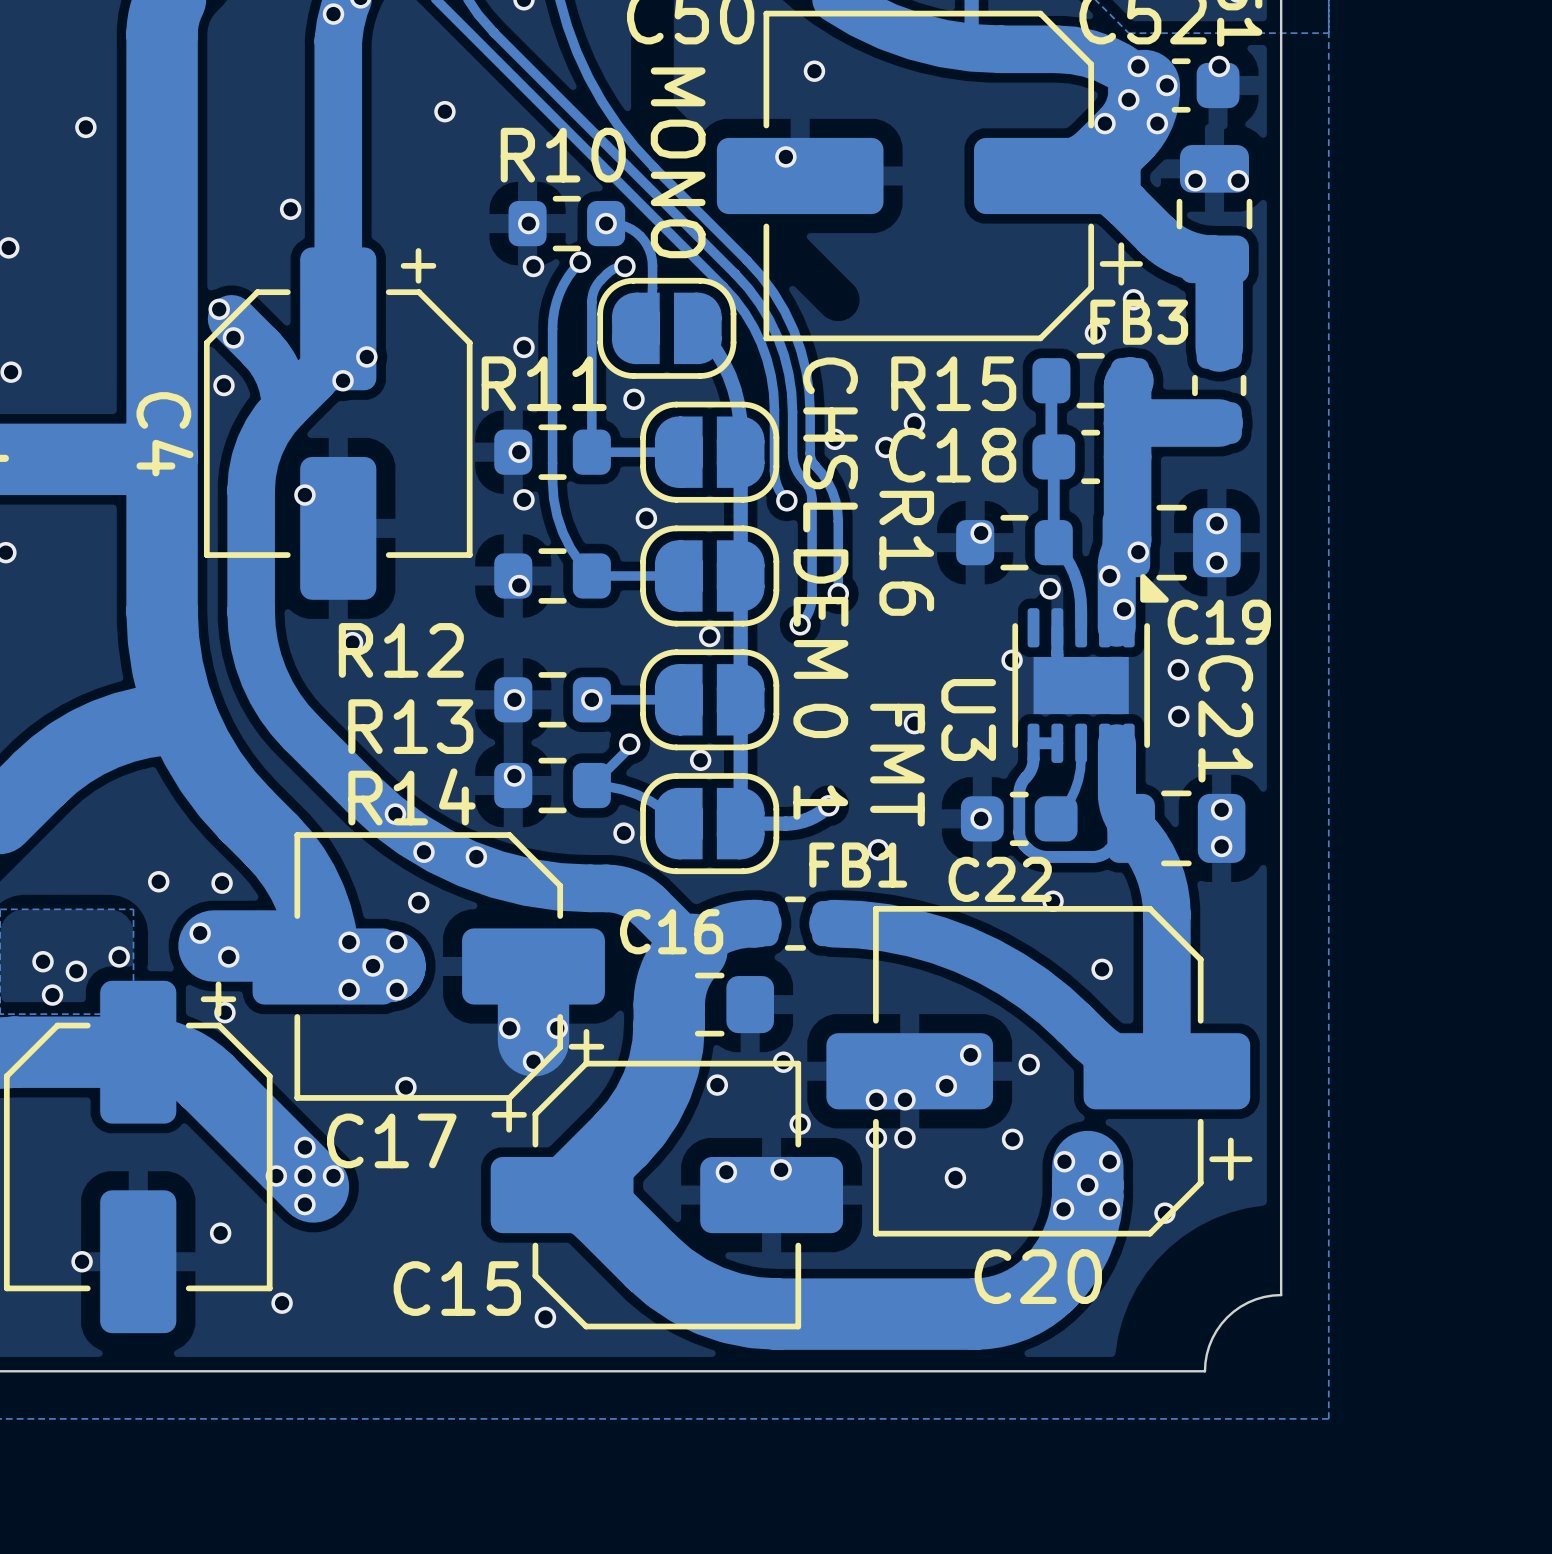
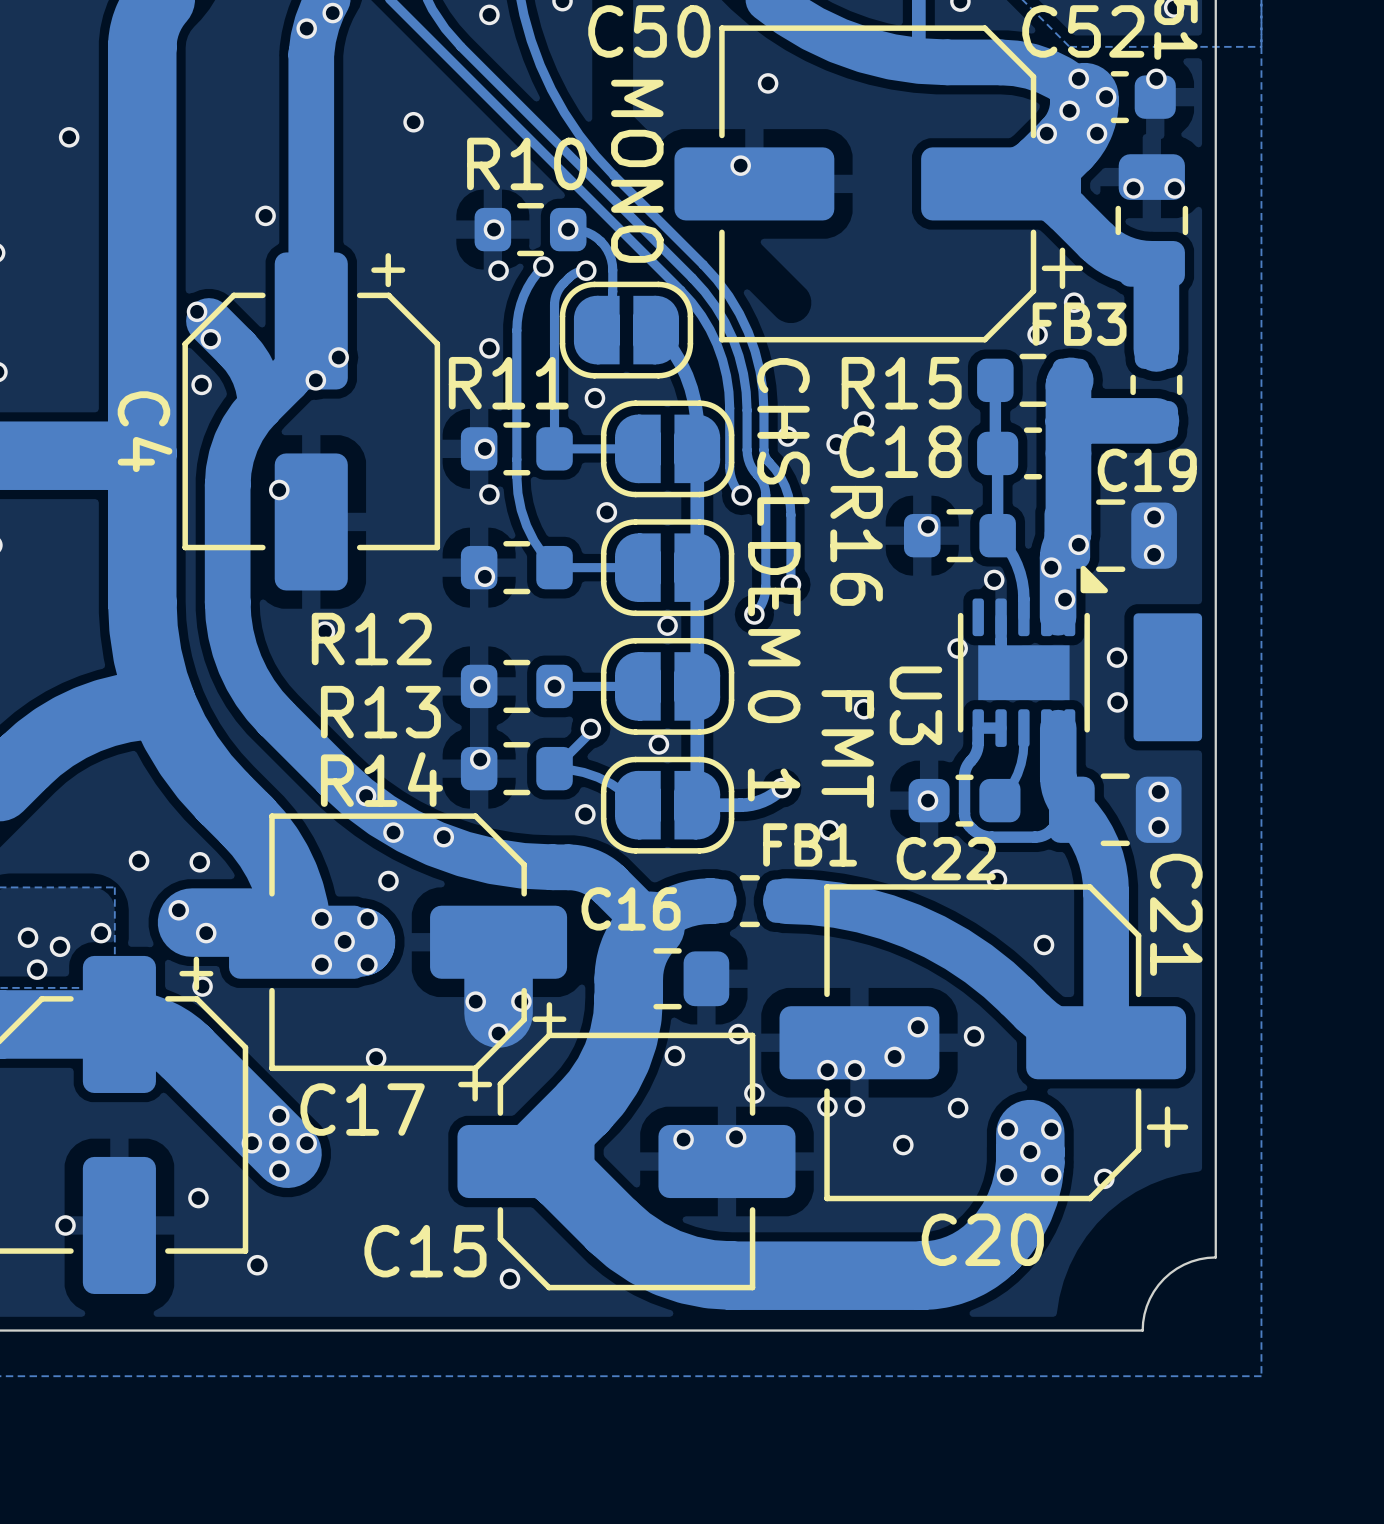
C19 name position: C19 (1219, 622) -> C19 (1147, 470)
drawing: none -> [1133, 613, 1203, 742]
C21 name position: C21 (1225, 718) -> C21 (1176, 914)

